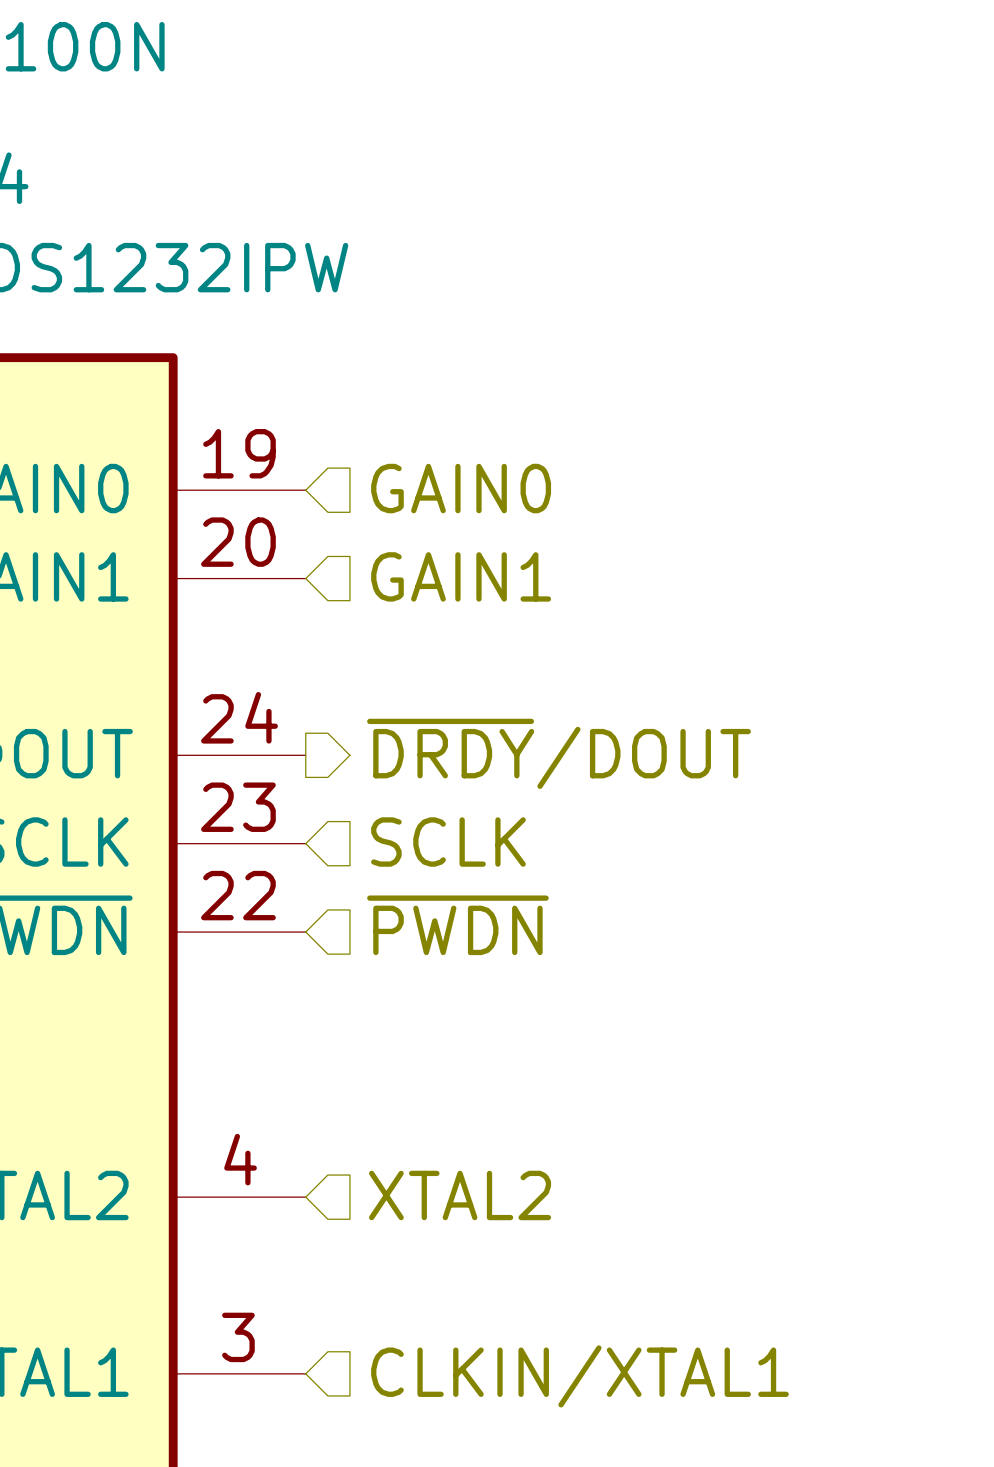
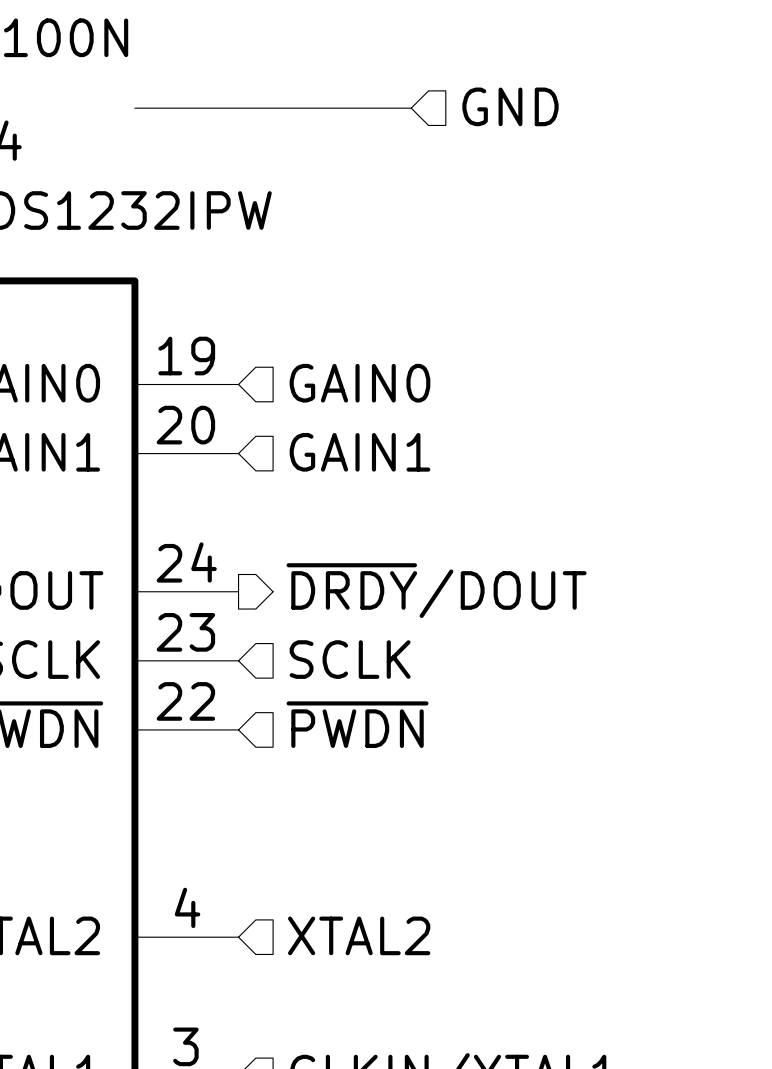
hierarchical label: none -> GND (510, 106)
wire: none -> (134, 108) (411, 108)

